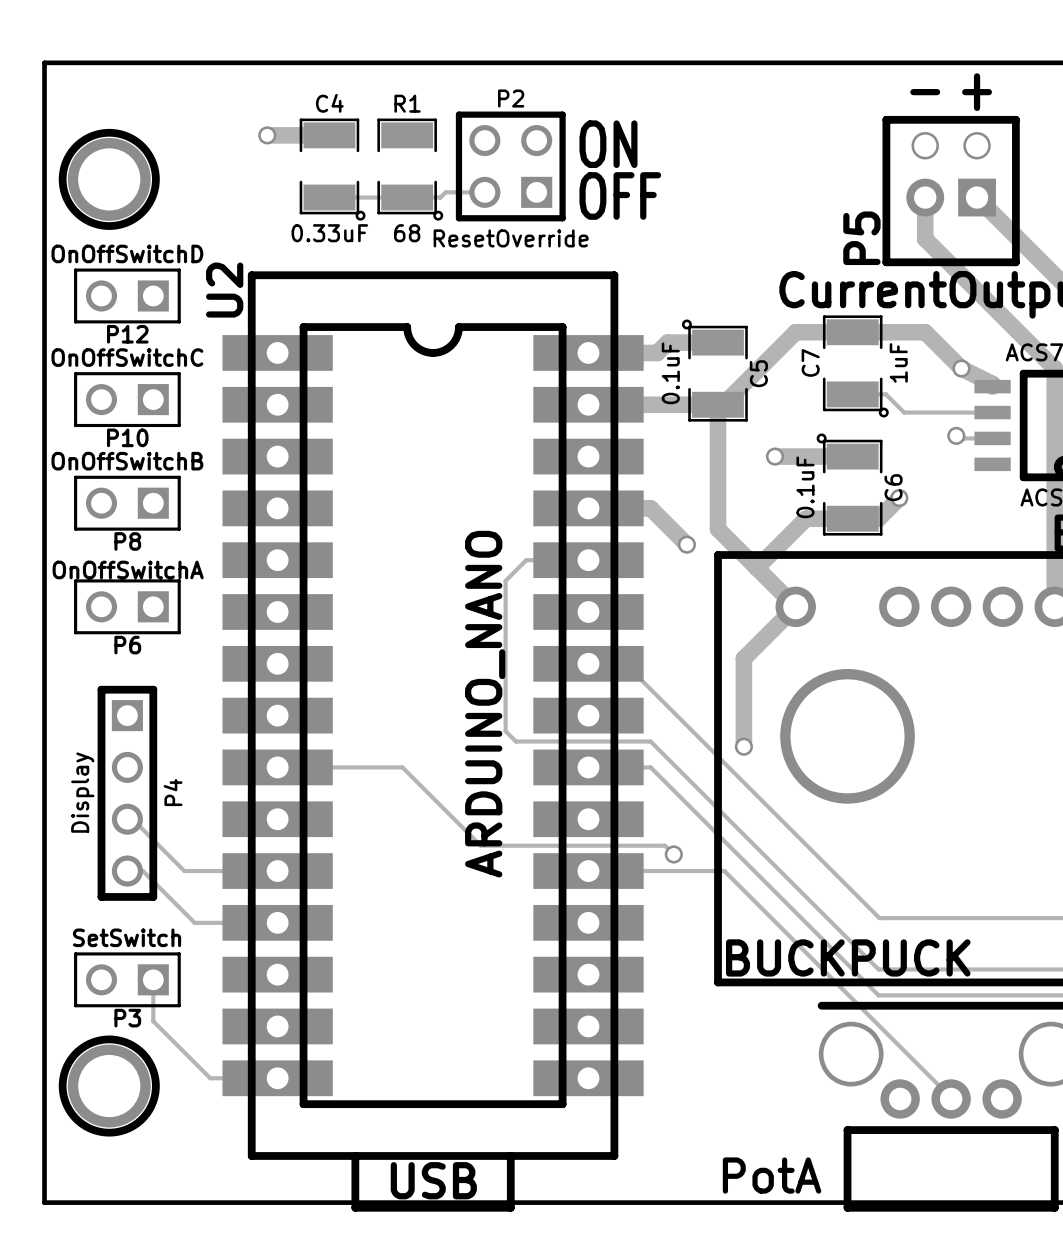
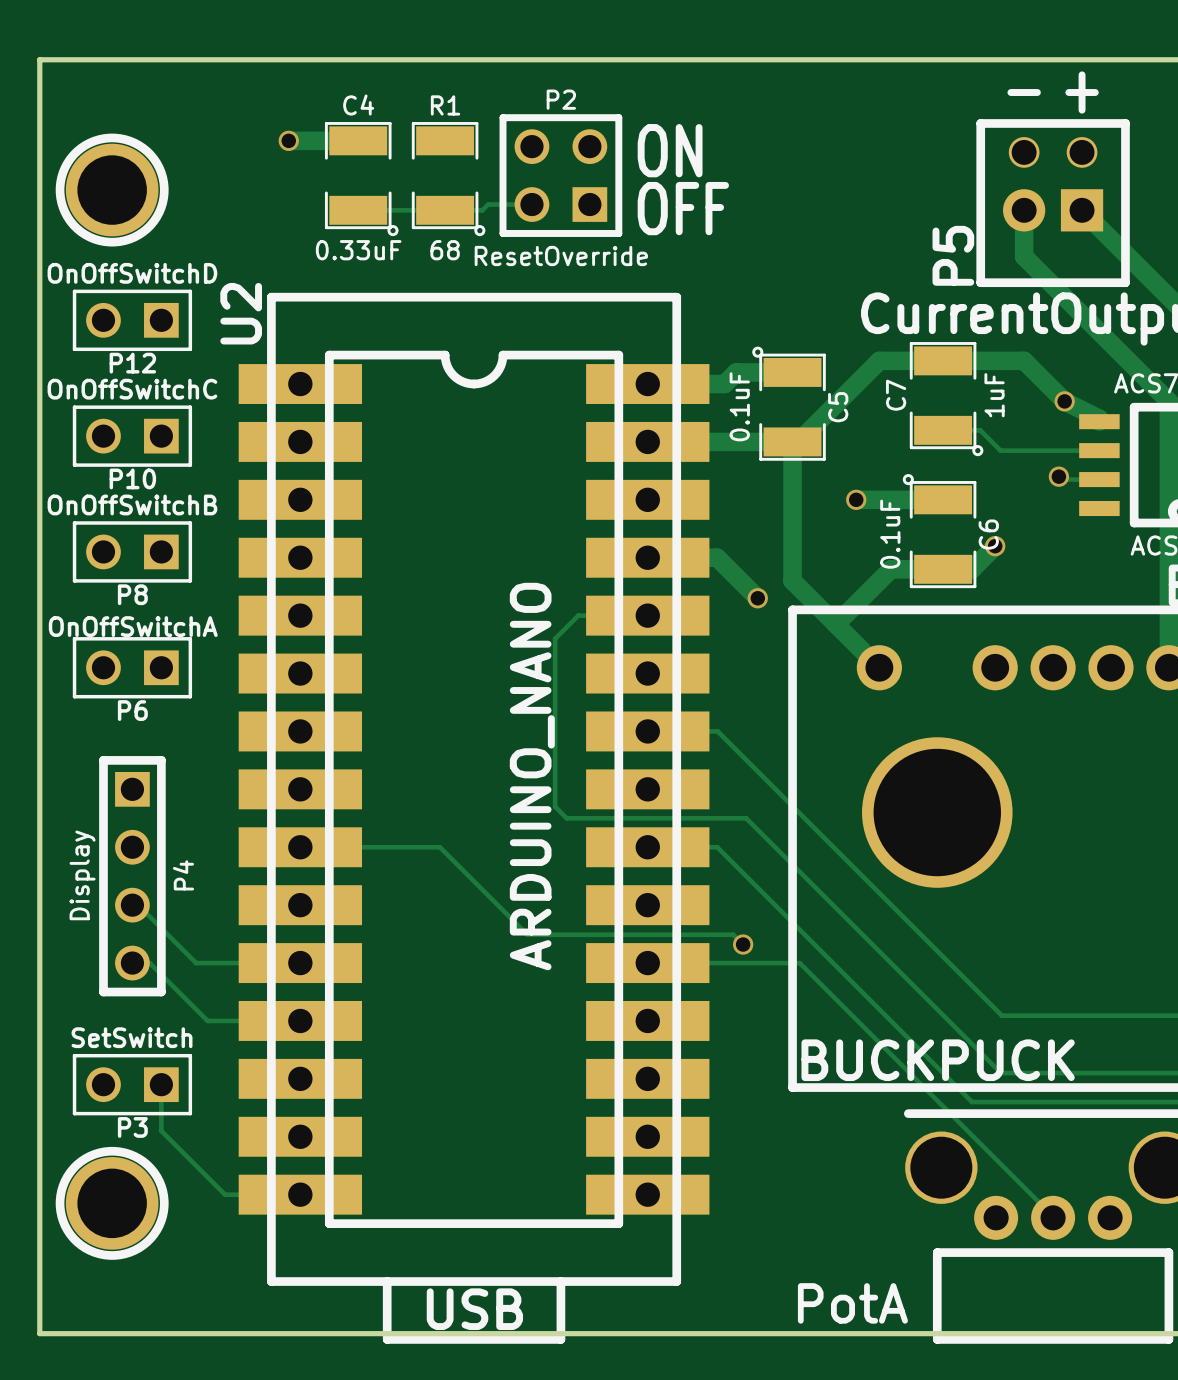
track: (795, 606) (743, 658) (743, 746) -> none
track: (625, 663) (879, 918) (905, 918) -> (688, 731) (717, 731) (1001, 1015)
track: (650, 741) (878, 969) (904, 969) -> (717, 818) (746, 818) (1000, 1073)
via: (743, 746) -> none

